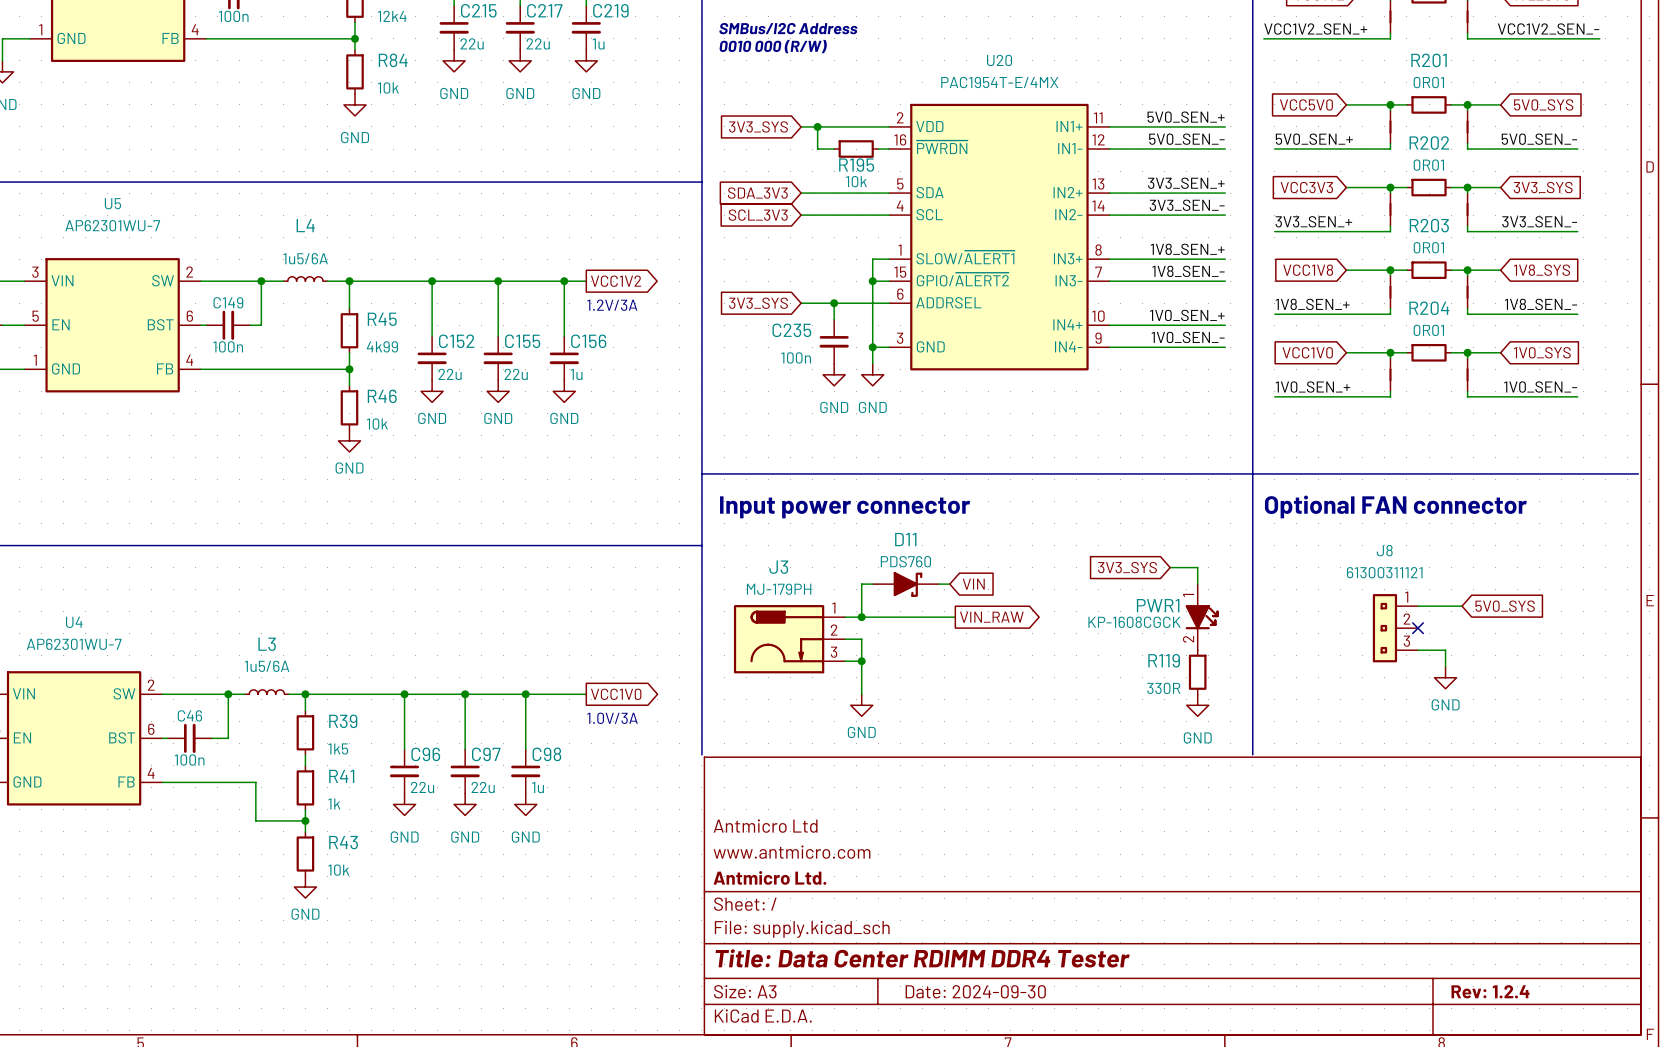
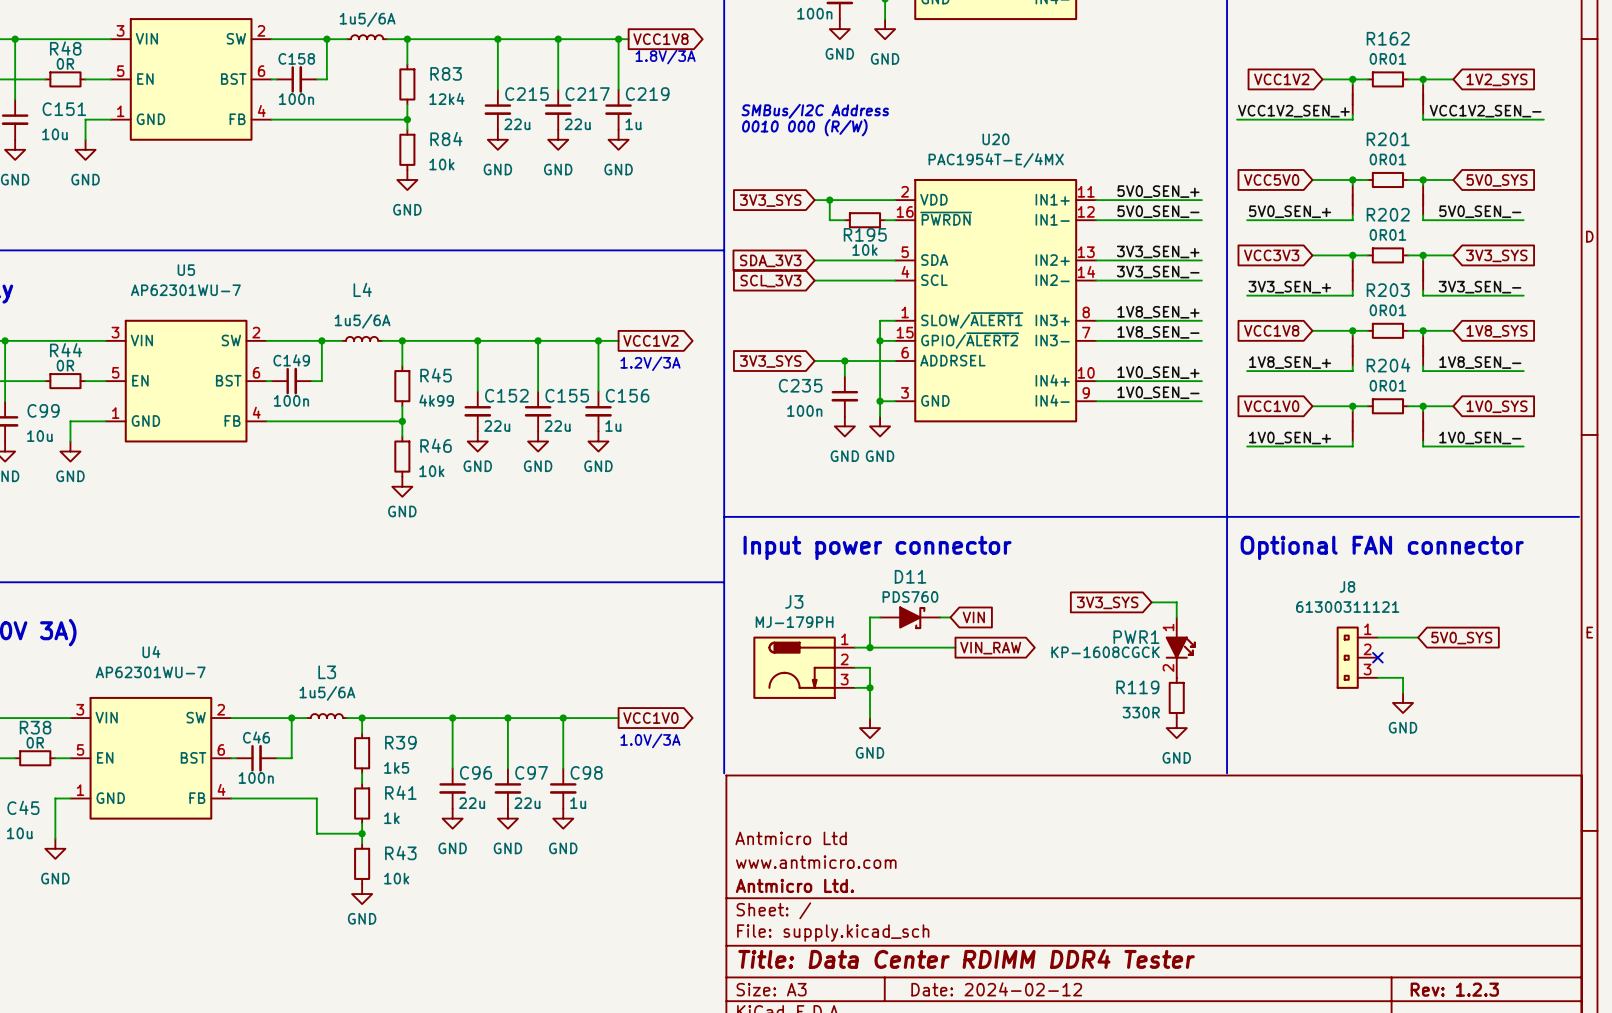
title block: Date: 2024-09-30 (975, 991) -> Date: 2024-02-12 (996, 989)
title block: Rev: 1.2.4 (1490, 991) -> Rev: 1.2.3 (1454, 989)

